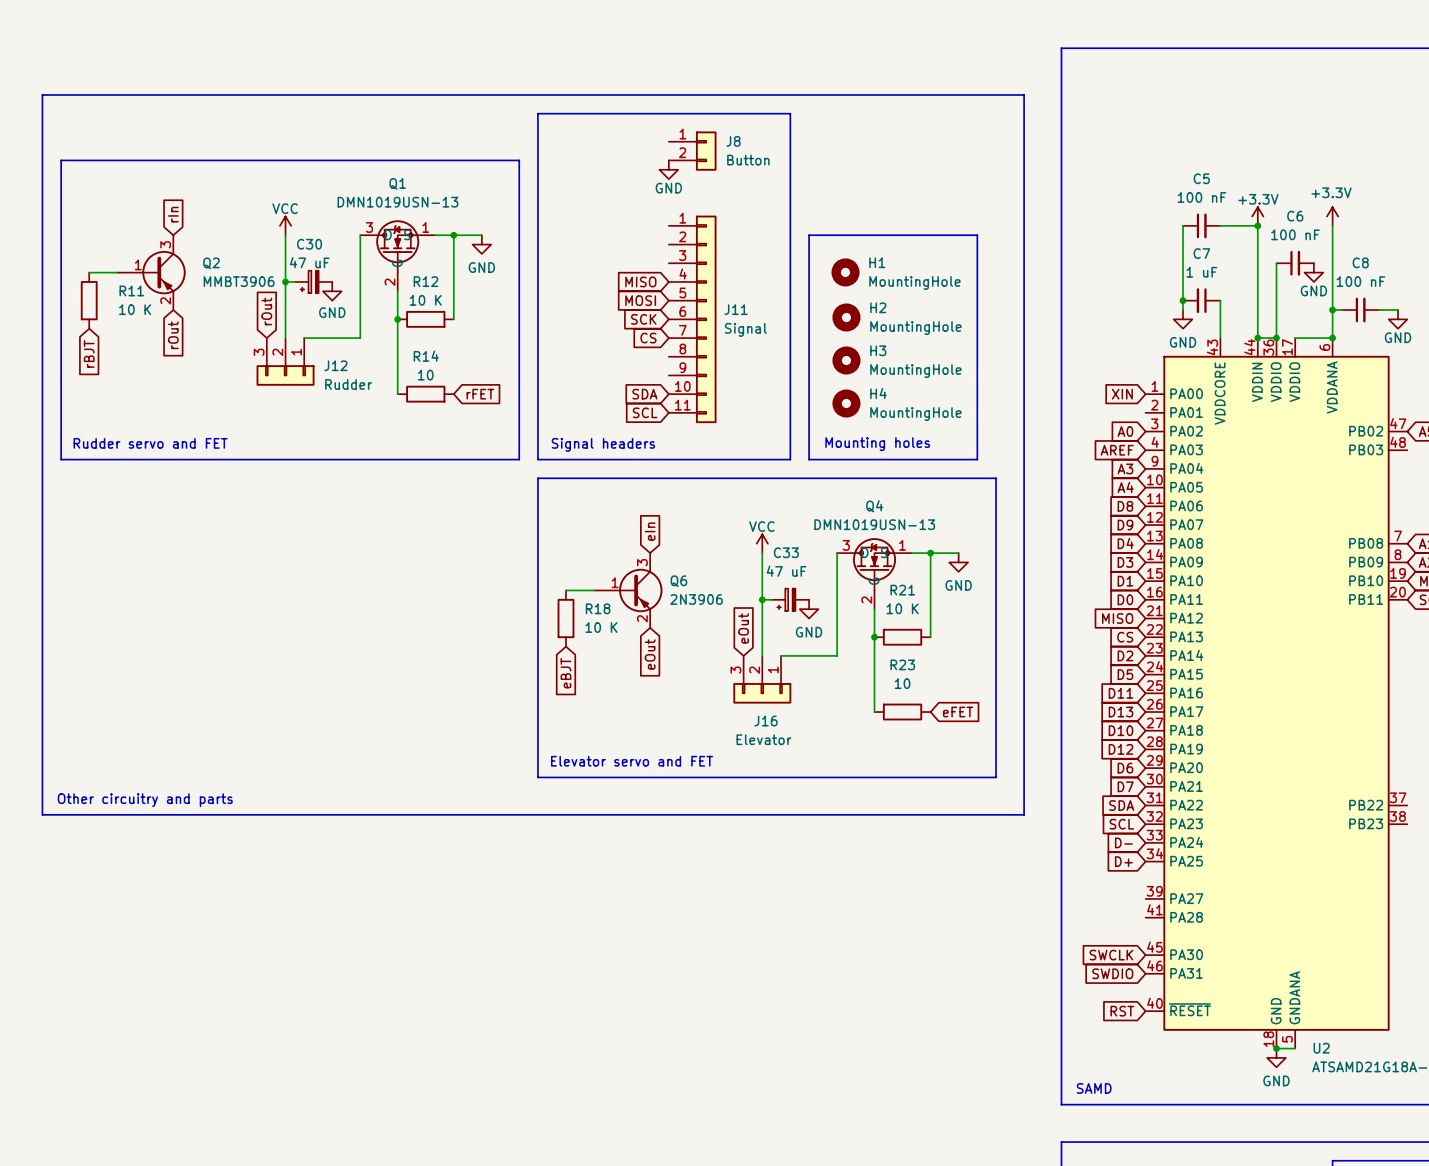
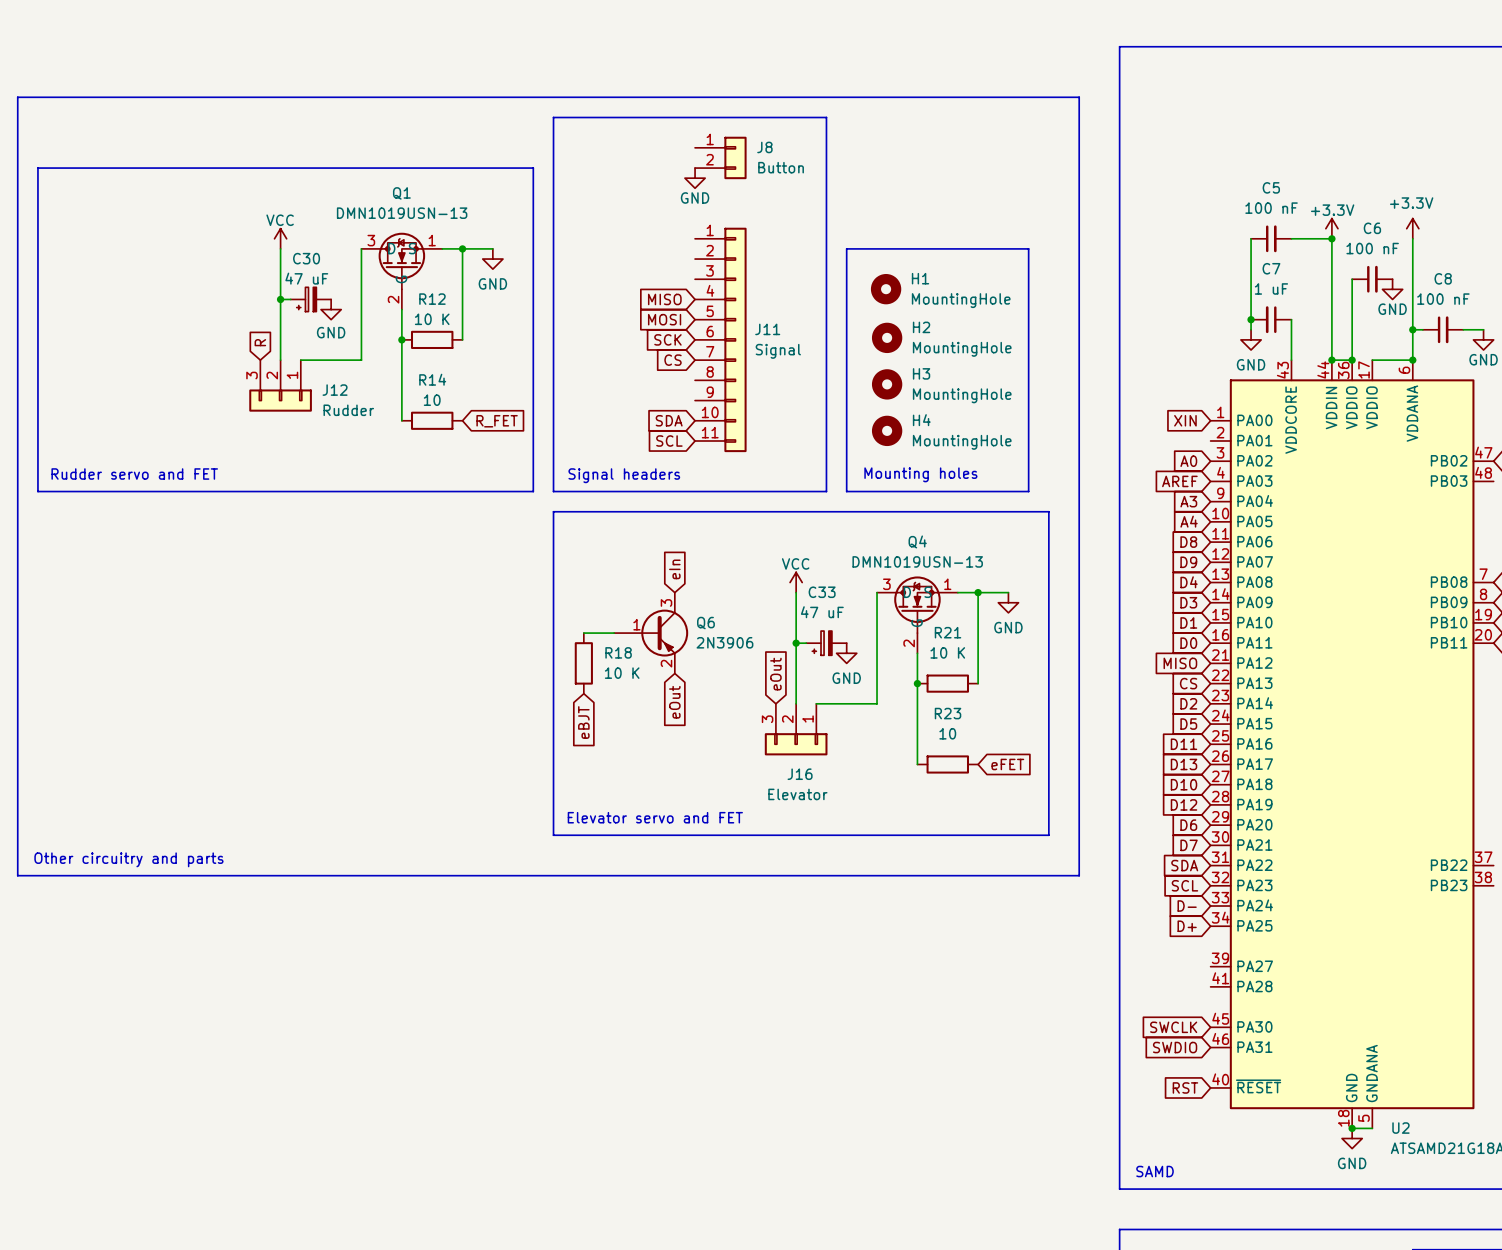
global label: rIn (173, 214) -> none
wire: (89, 272) (117, 272) -> none
Q2: MMBT3906 (151, 272) -> none
R11: 10 K (89, 300) -> none
global label: rOut (266, 311) -> R (260, 342)
global label: rOut (173, 335) -> none
global label: rBJT (89, 353) -> none
global label: rFET (480, 394) -> R_FET (497, 421)

